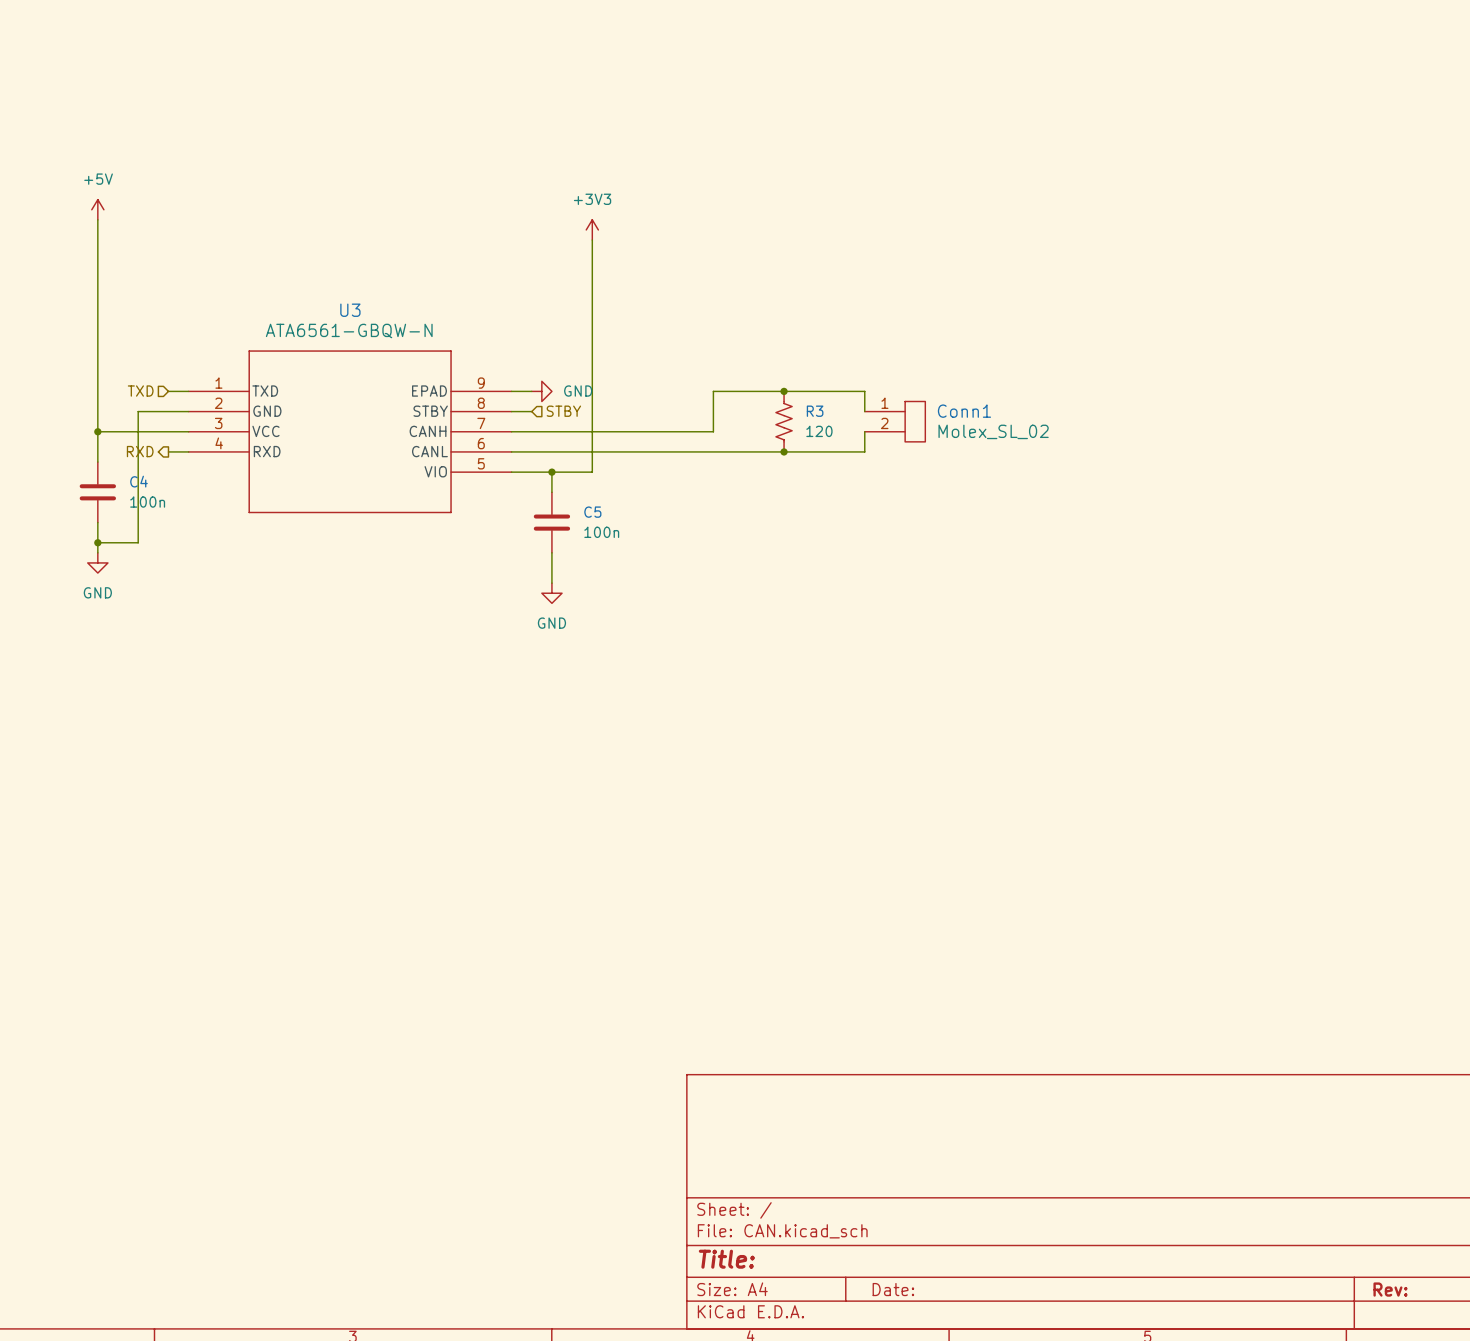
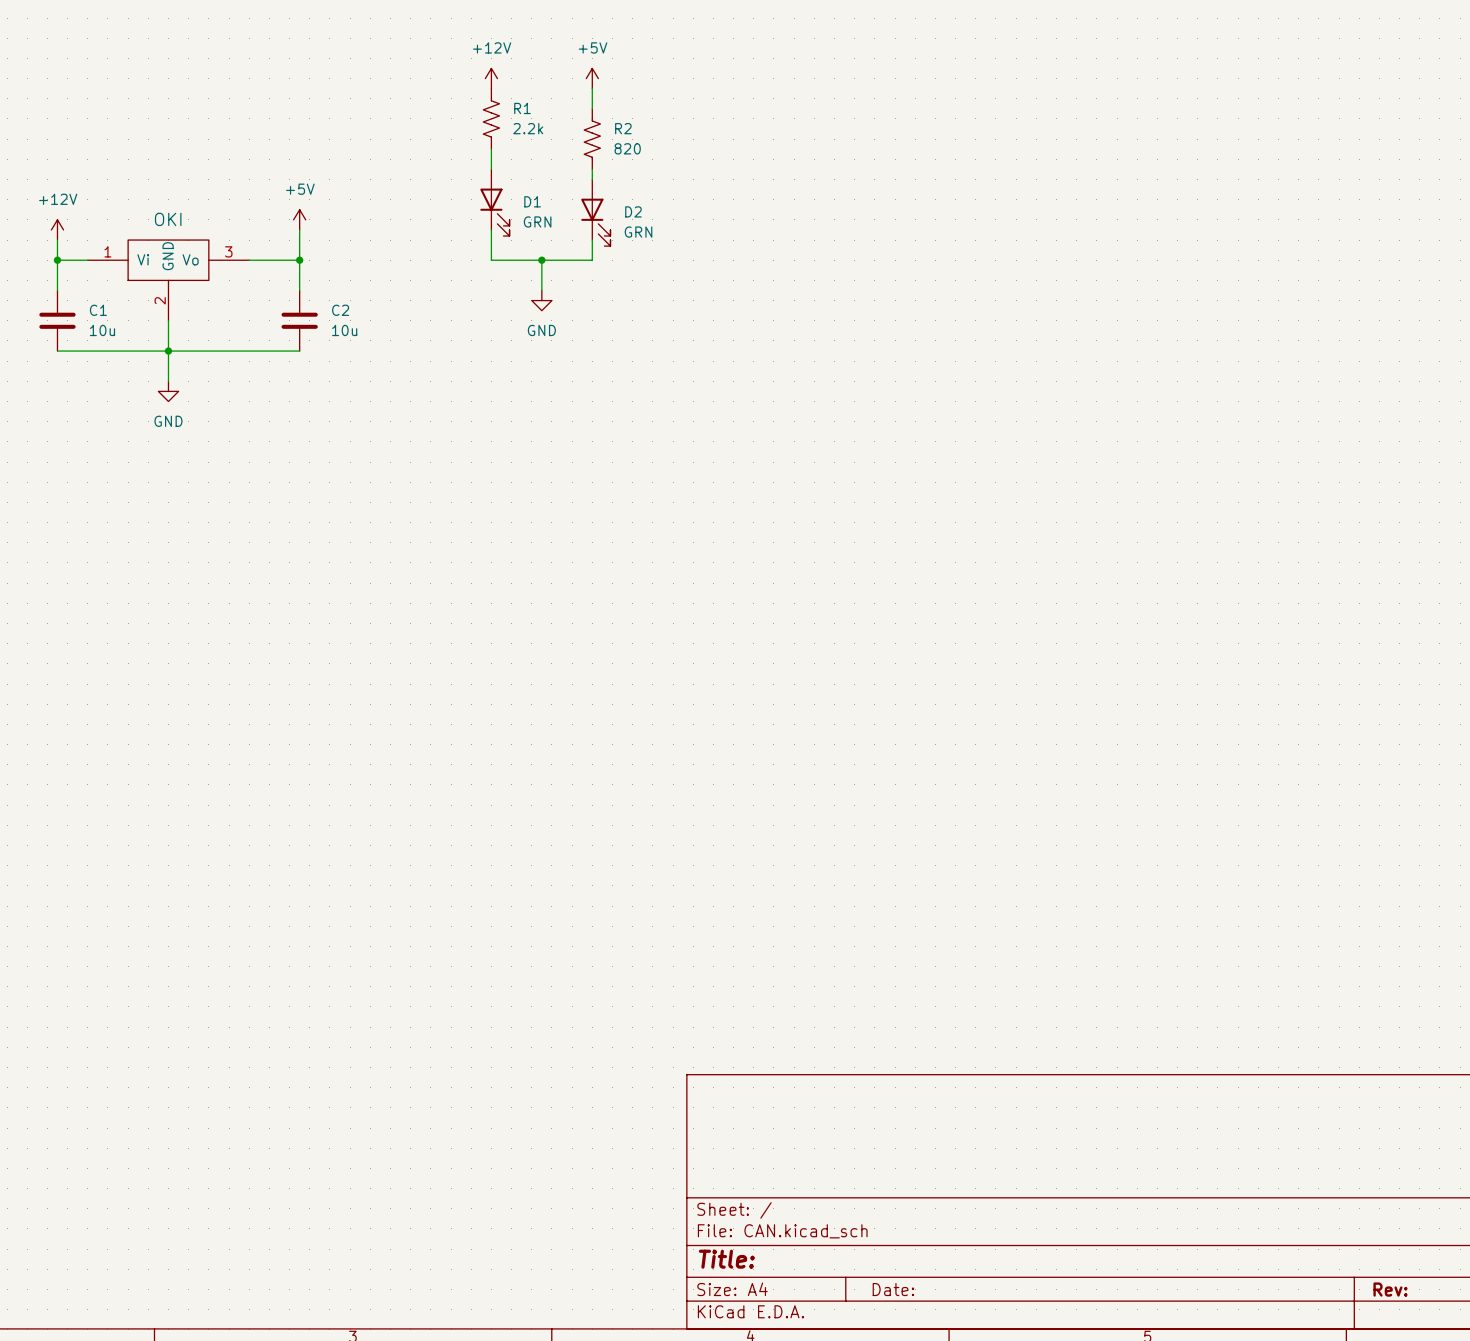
power symbol: none -> +12V (491, 78)
power symbol: none -> +5V (592, 78)
wire: none -> (592, 88) (592, 108)
R1: none -> 2.2k (491, 118)
R2: none -> 820 (592, 139)
wire: none -> (491, 149) (491, 169)
wire: none -> (592, 169) (592, 179)
D1: none -> GRN (494, 202)
power symbol: +5V (97, 209) -> none
D2: none -> GRN (595, 212)
wire: (97, 219) (97, 462) -> none
power symbol: none -> +5V (299, 219)
power symbol: none -> +12V (57, 229)
wire: none -> (299, 229) (299, 290)
power symbol: +3V3 (592, 229) -> none
wire: none -> (57, 240) (57, 290)
wire: none -> (57, 260) (87, 260)
junction: none -> (57, 260)
wire: none -> (249, 260) (299, 260)
junction: none -> (299, 260)
wire: none -> (541, 260) (541, 290)
junction: none -> (541, 260)
wire: (592, 260) (592, 472) (511, 472) -> (592, 260) (491, 260) (491, 229)
part: none -> OKI (168, 280)
C1: none -> 10u (57, 320)
wire: none -> (168, 320) (168, 381)
C2: none -> 10u (299, 320)
wire: none -> (57, 351) (299, 351)
junction: none -> (168, 351)
hierarchical label: TXD (140, 391) -> none
wire: (168, 391) (188, 391) -> none
wire: (511, 391) (531, 391) -> none
power symbol rotation: 0° (541, 391) -> 90° clockwise (541, 300)
power symbol position: GND (541, 391) -> GND (541, 300)
junction: (784, 391) -> none
wire: (188, 411) (138, 411) (138, 542) (97, 542) -> none
wire: (511, 411) (531, 411) -> none
hierarchical label: STBY (563, 411) -> none
wire: (864, 411) (864, 391) (713, 391) (713, 431) (511, 431) -> none
R3: 120 (784, 421) -> none
Conn1: Molex_SL_02 (895, 421) -> none
wire: (97, 431) (188, 431) -> none
junction: (97, 431) -> none
U3: ATA6561-GBQW-N (350, 431) -> none
wire: (864, 431) (864, 451) (511, 451) -> none
hierarchical label: RXD (140, 451) -> none
wire: (168, 451) (188, 451) -> none
junction: (784, 451) -> none
wire: (551, 472) (551, 492) -> none
junction: (551, 472) -> none
C4: 100n (97, 492) -> none
wire: (97, 522) (97, 552) -> none
C5: 100n (551, 522) -> none
junction: (97, 542) -> none
wire: (551, 552) (551, 583) -> none
power symbol position: GND (97, 562) -> GND (168, 391)
power symbol: GND (551, 593) -> none

